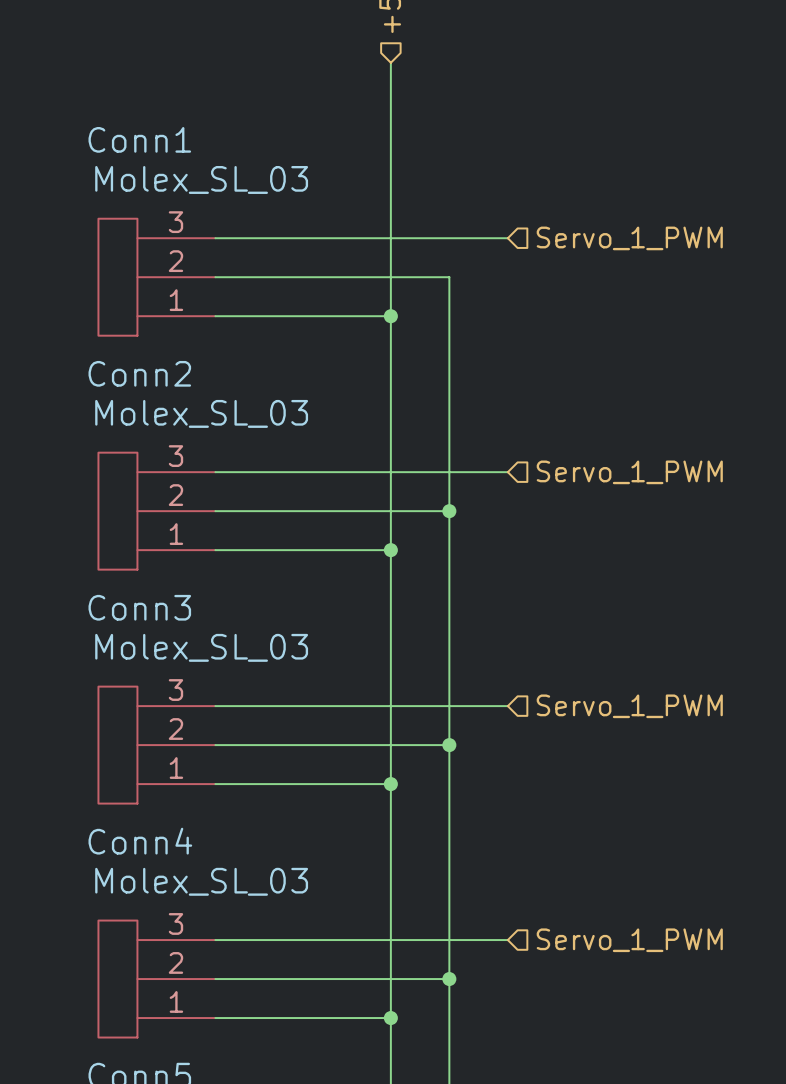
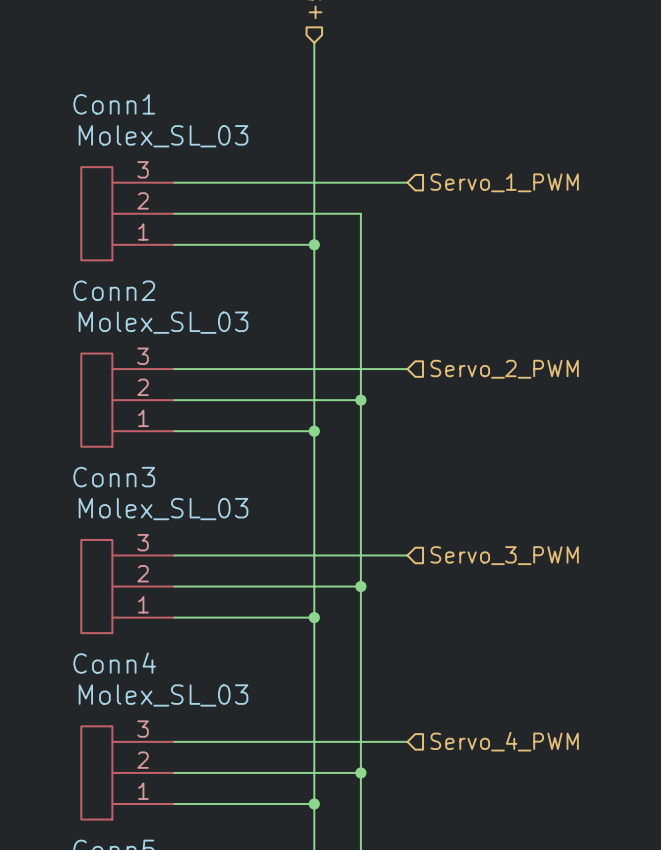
hierarchical label: Servo_1_PWM (629, 472) -> Servo_2_PWM (504, 369)
hierarchical label: Servo_1_PWM (629, 706) -> Servo_3_PWM (504, 555)
hierarchical label: Servo_1_PWM (629, 940) -> Servo_4_PWM (504, 741)

